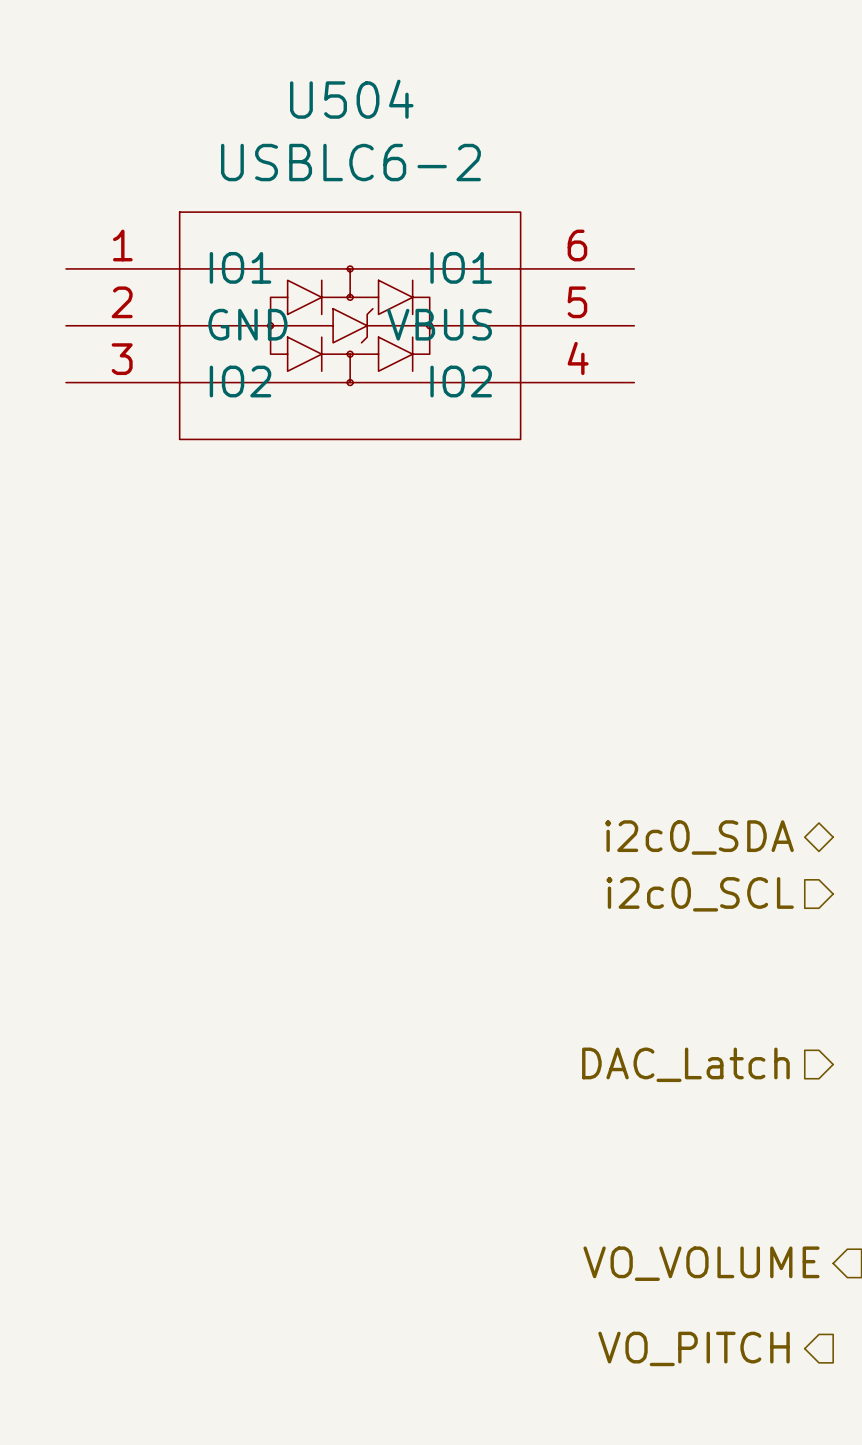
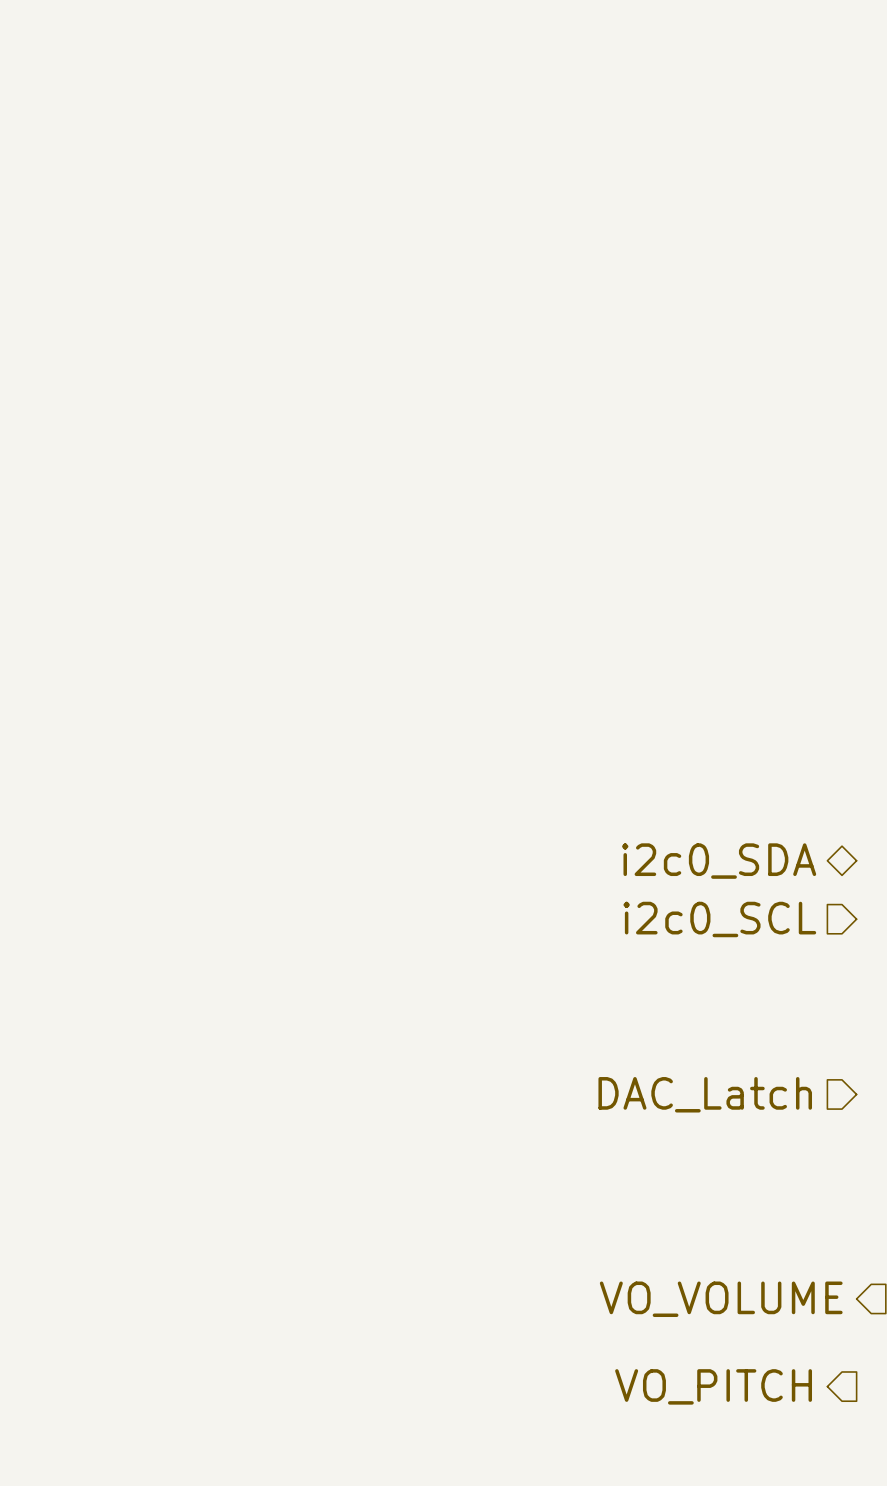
U504: USBLC6-2 (350, 325) -> none

